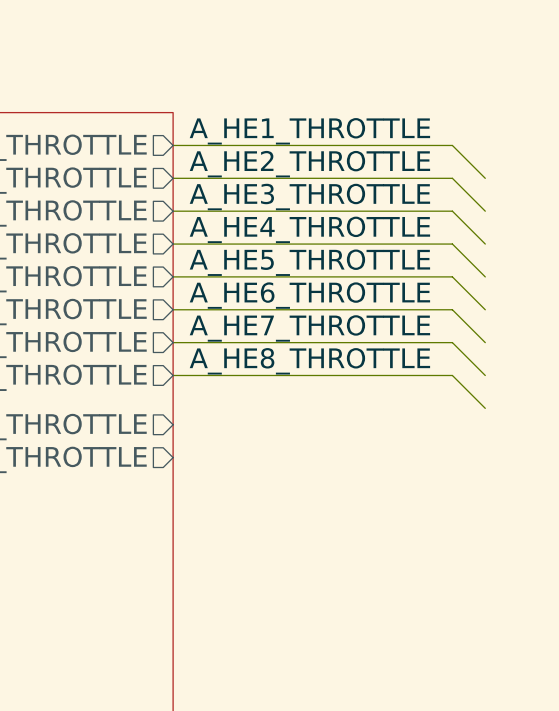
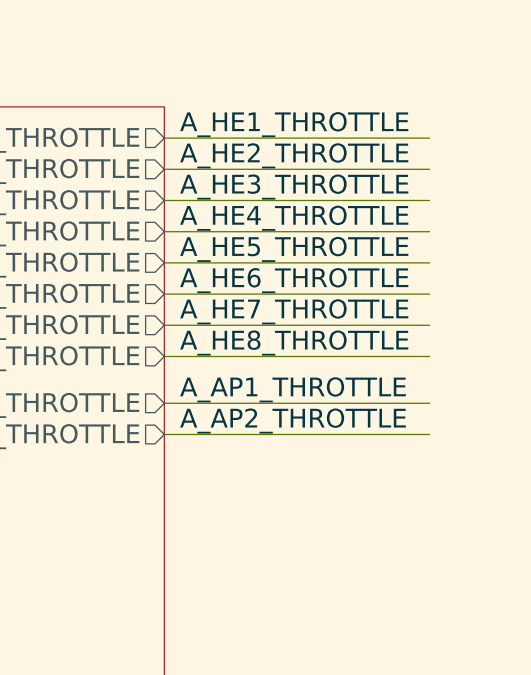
wire: (452, 145) (485, 178) -> none
wire: (452, 178) (485, 211) -> none
wire: (452, 211) (485, 244) -> none
wire: (452, 244) (485, 276) -> none
wire: (452, 276) (485, 309) -> none
wire: (452, 309) (485, 342) -> none
wire: (452, 342) (485, 375) -> none
wire: (452, 375) (485, 408) -> none
label: none -> A_AP1_THROTTLE (292, 389)
wire: none -> (164, 403) (429, 403)
label: none -> A_AP2_THROTTLE (292, 421)
wire: none -> (164, 434) (429, 434)

